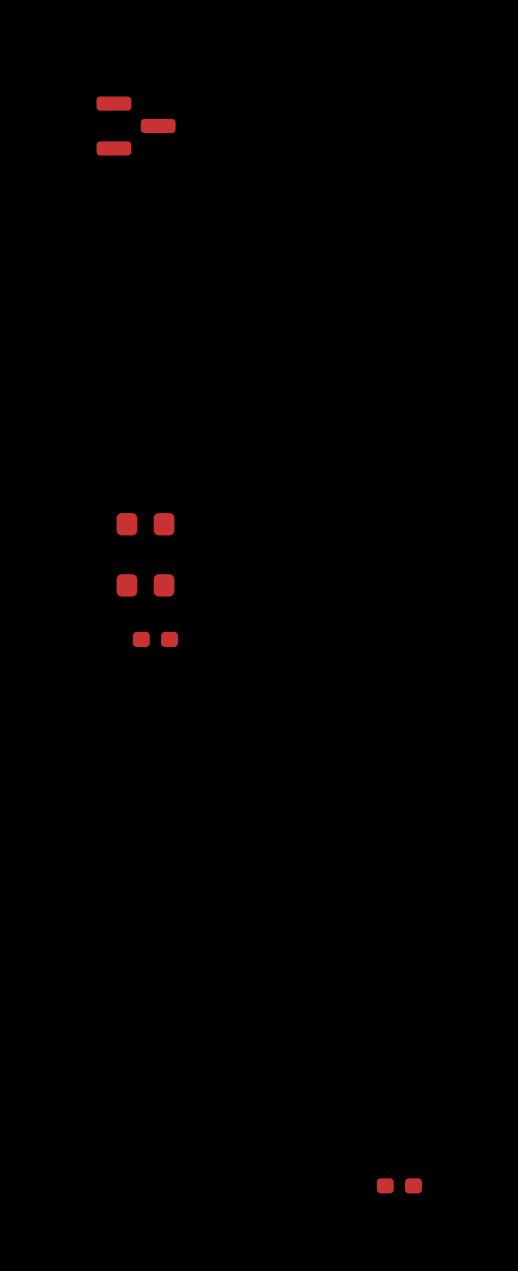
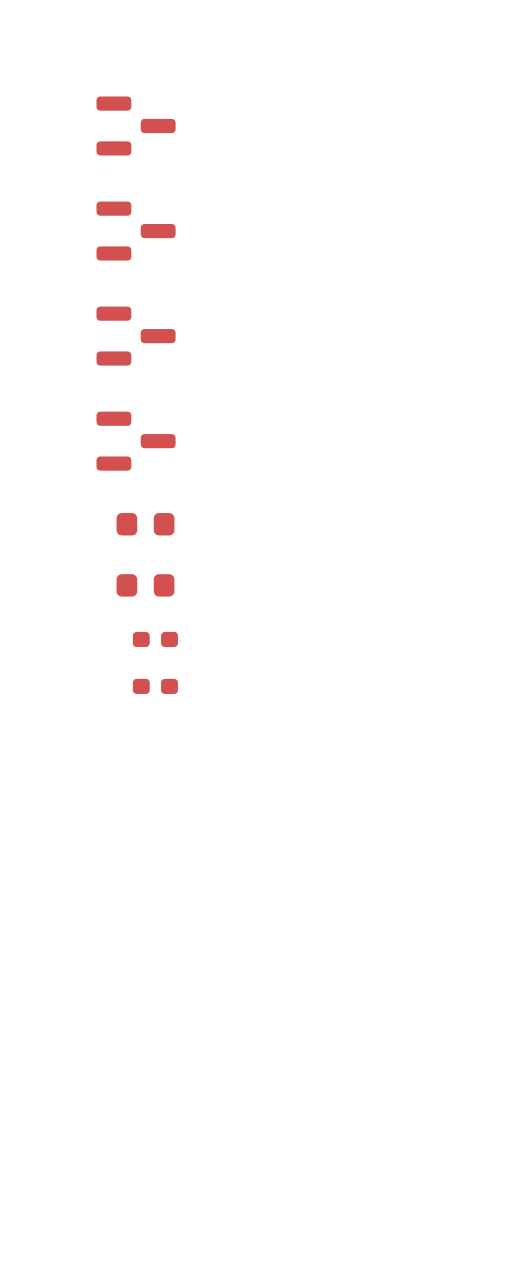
part: none -> (136, 231)
part: none -> (136, 336)
part: none -> (136, 441)
part position: (399, 1185) -> (155, 686)

